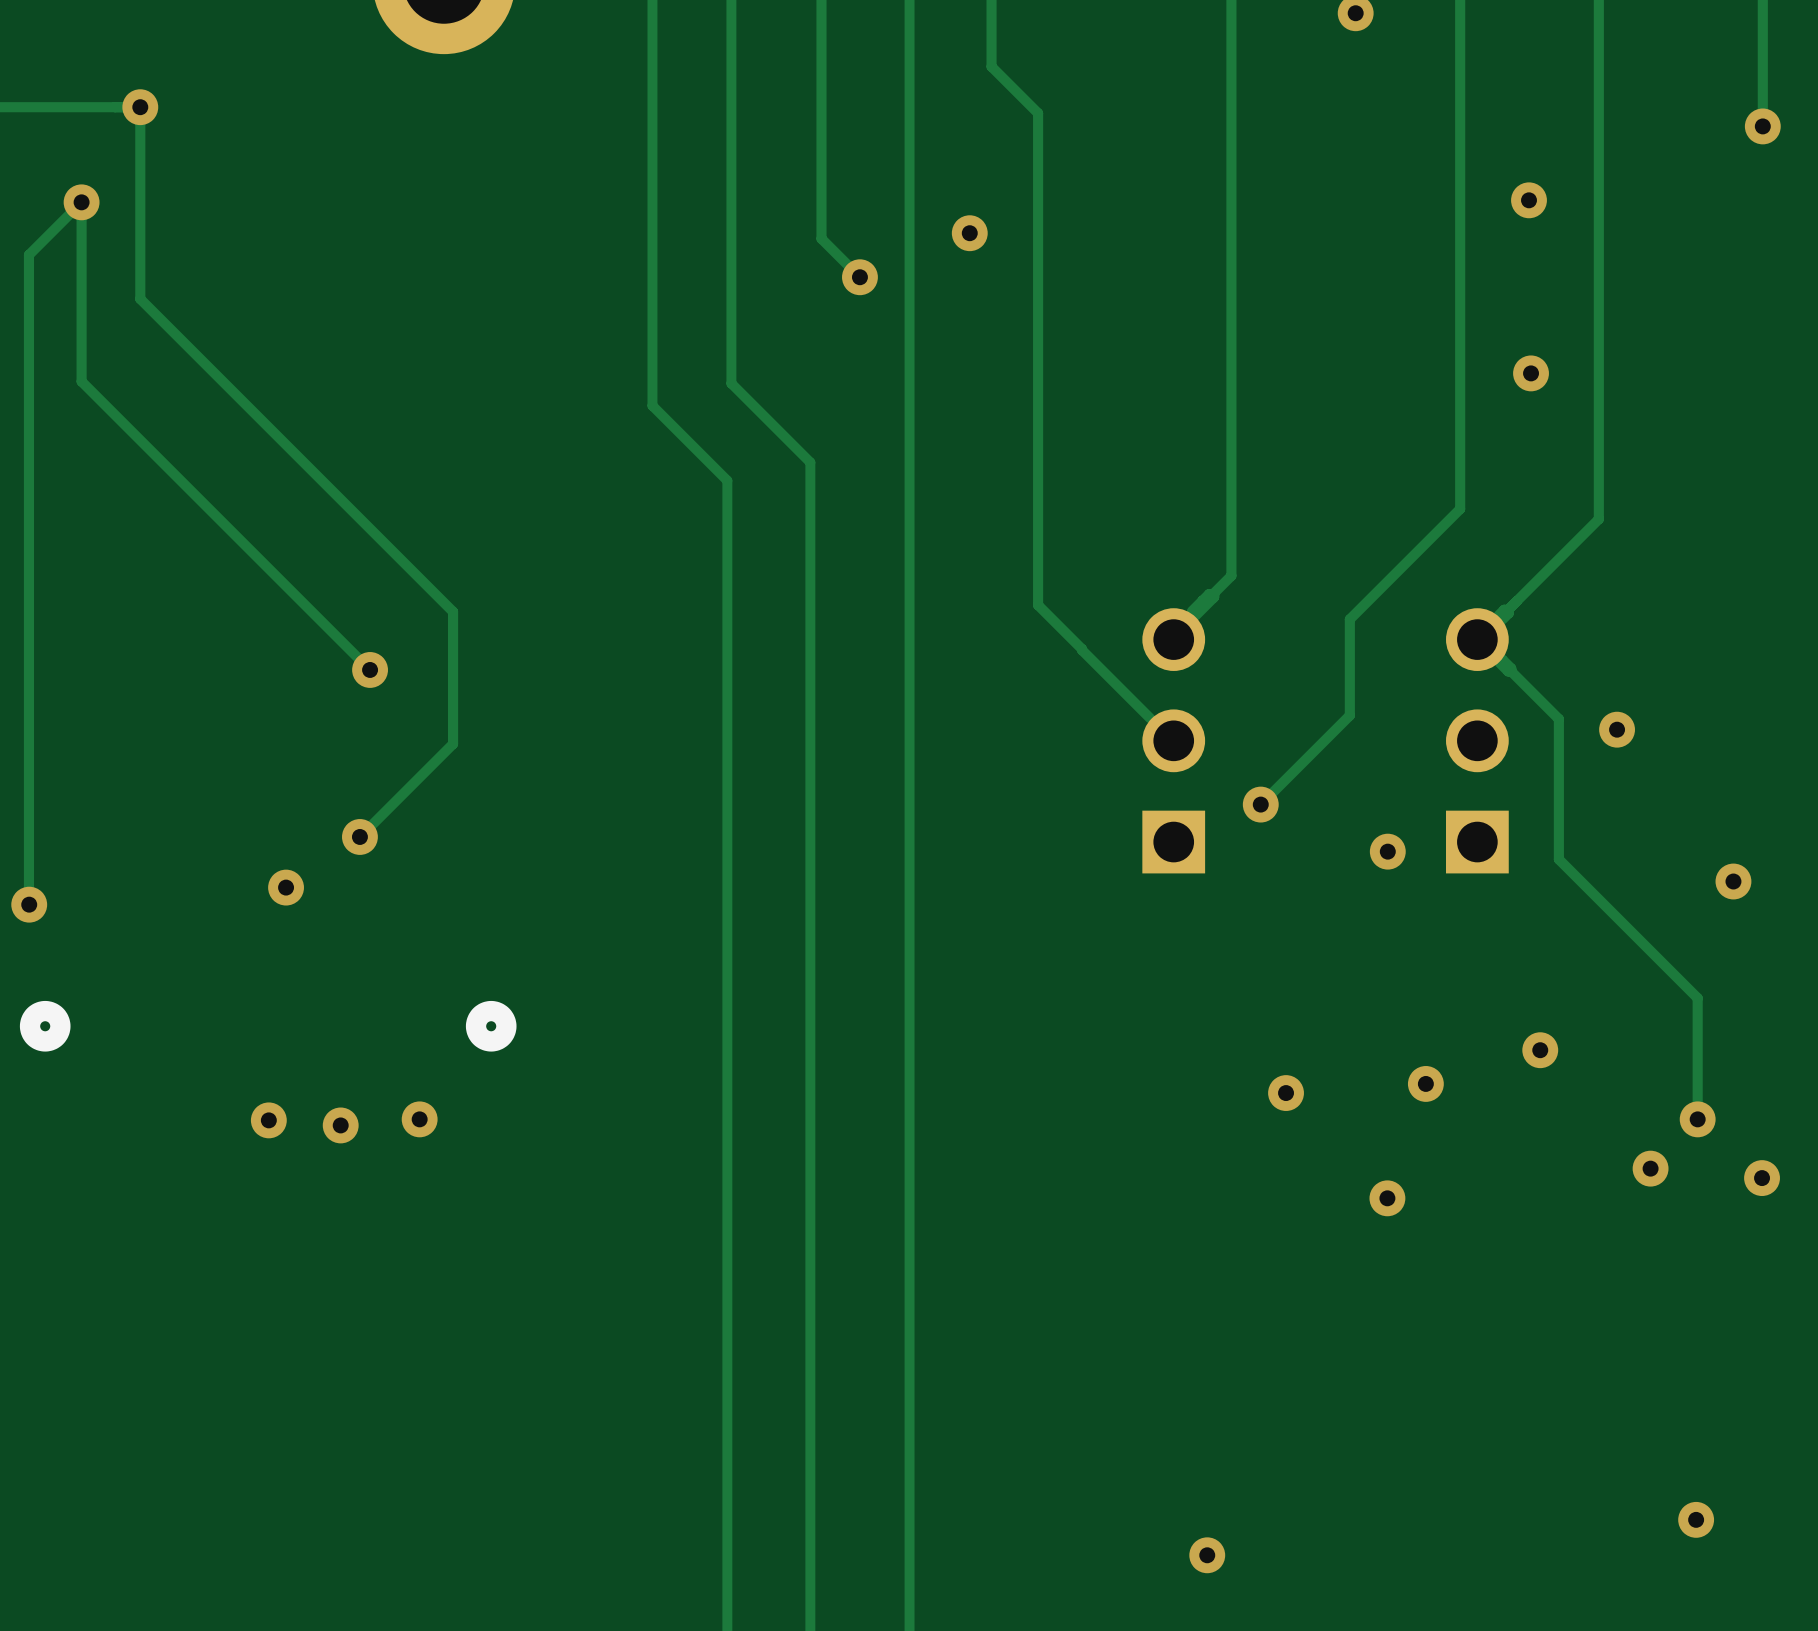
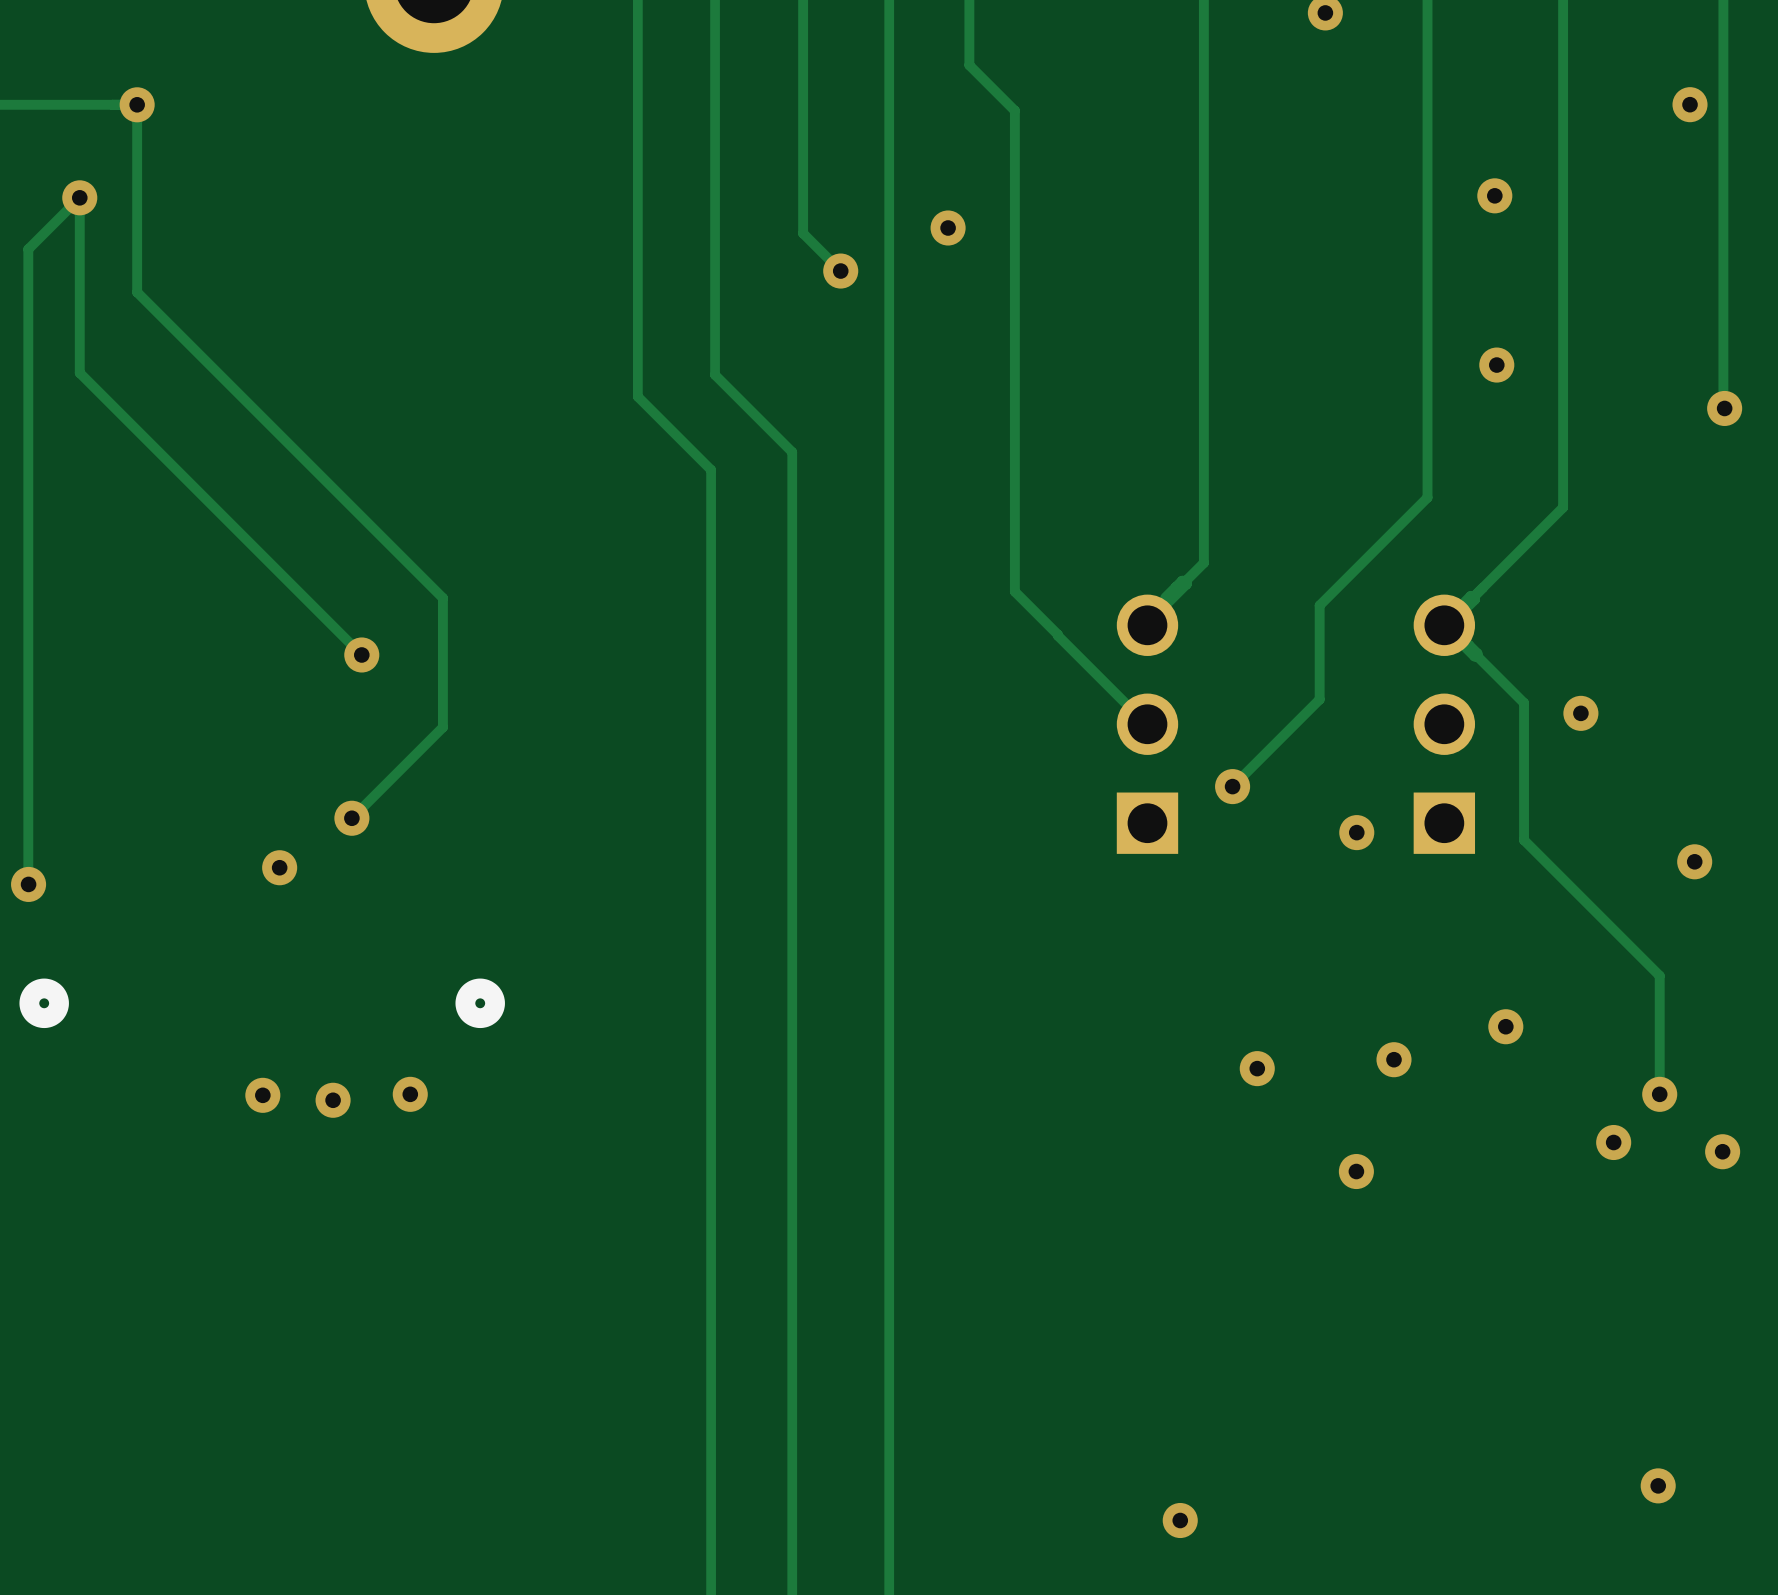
track: none -> (1723, 123) (1724, 408)
via position: (1762, 126) -> (1690, 104)
via: none -> (1724, 408)

